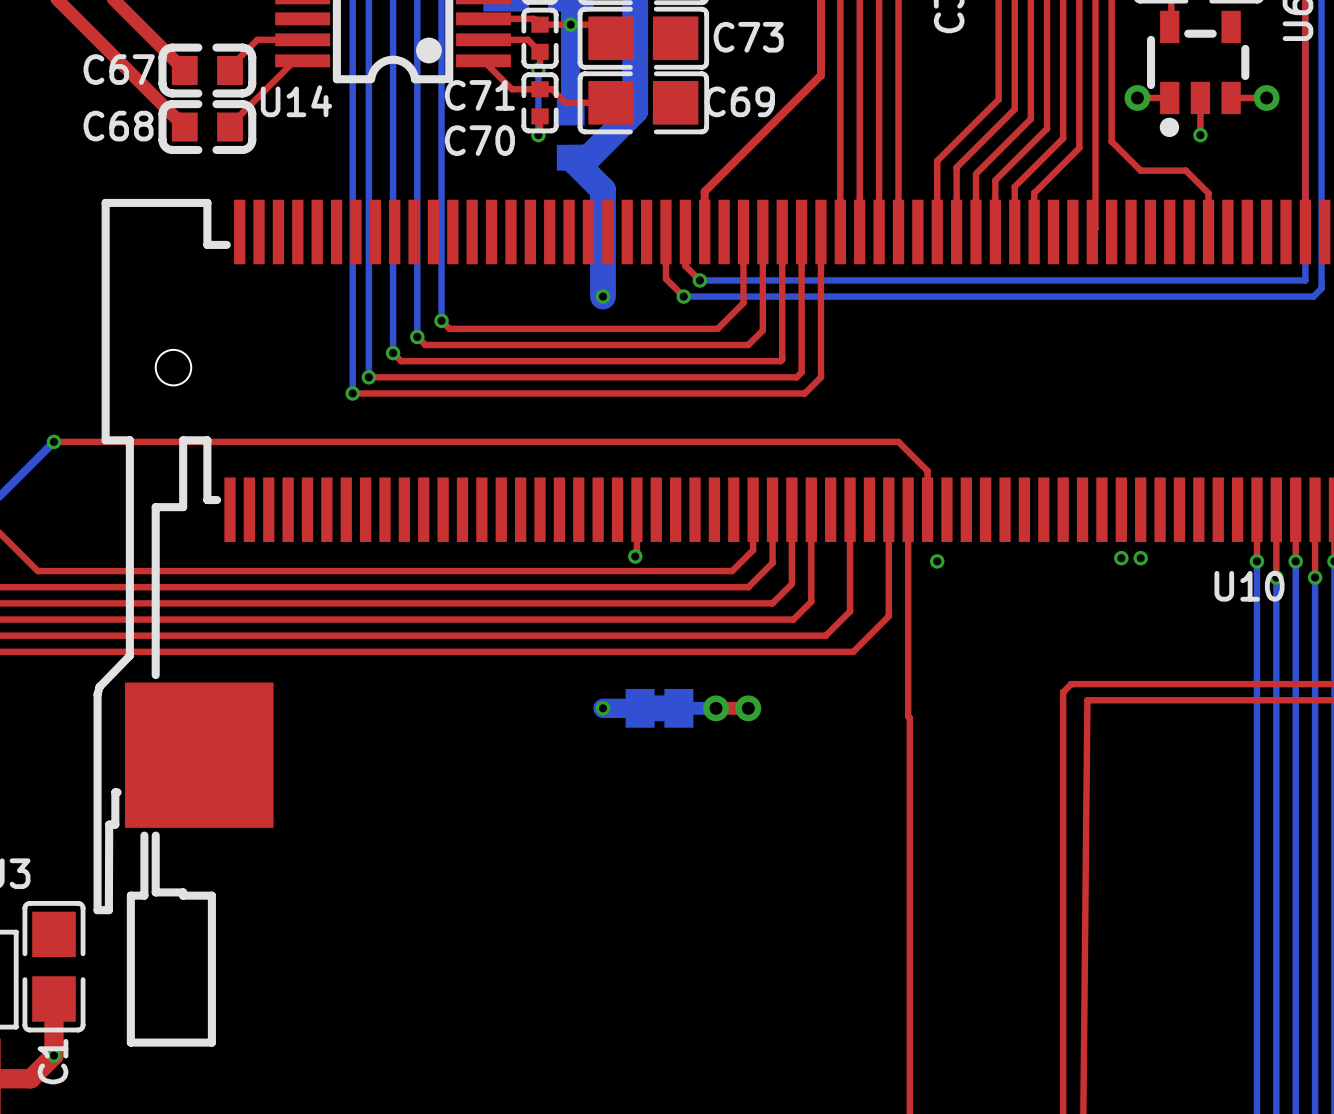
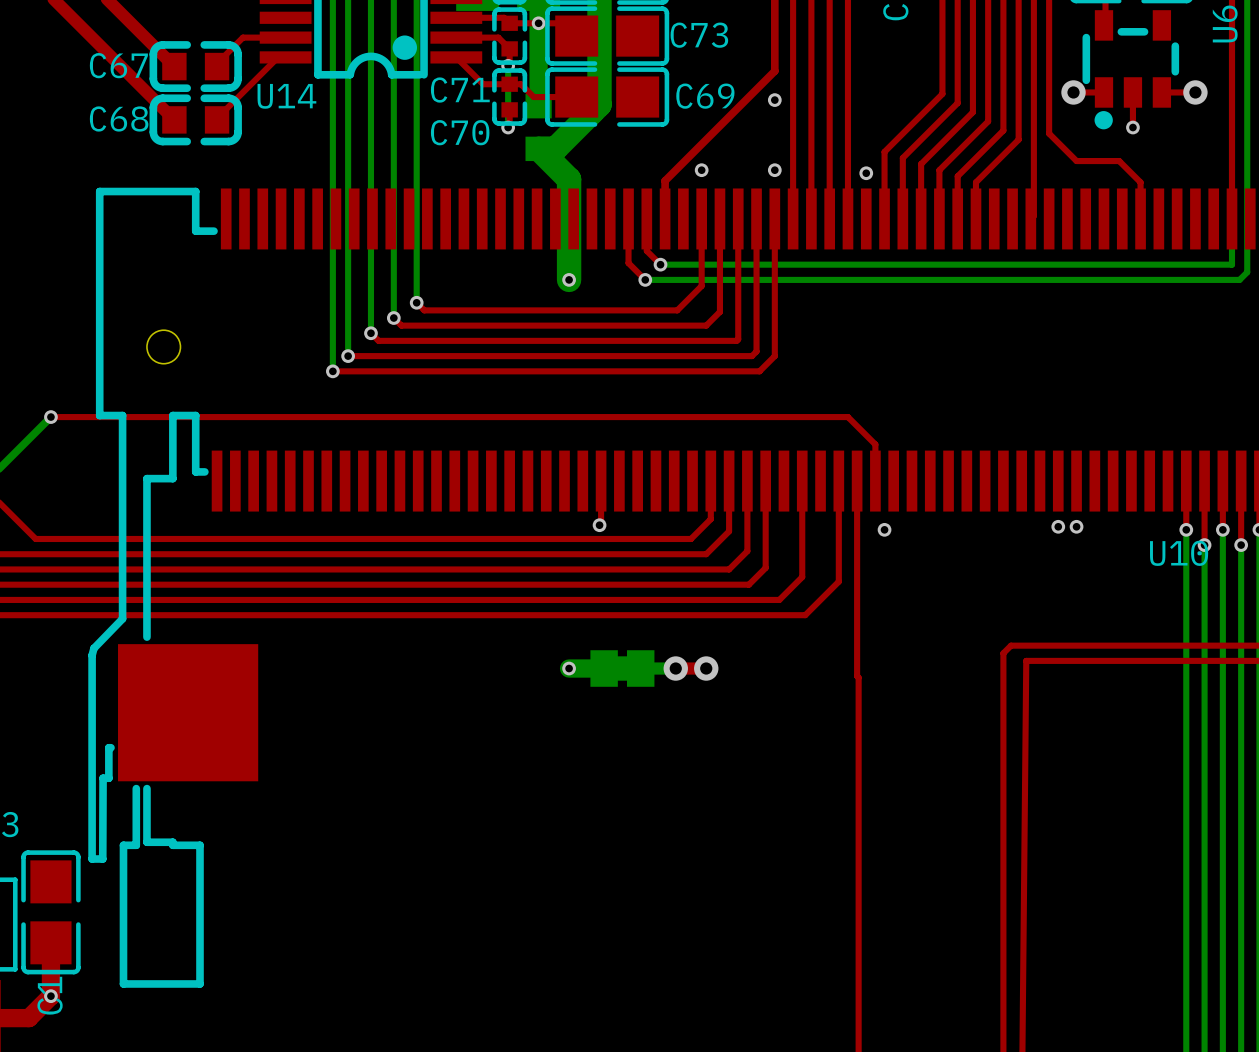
via: none -> (774, 100)
via: none -> (701, 170)
via: none -> (774, 170)
via: none -> (866, 173)

